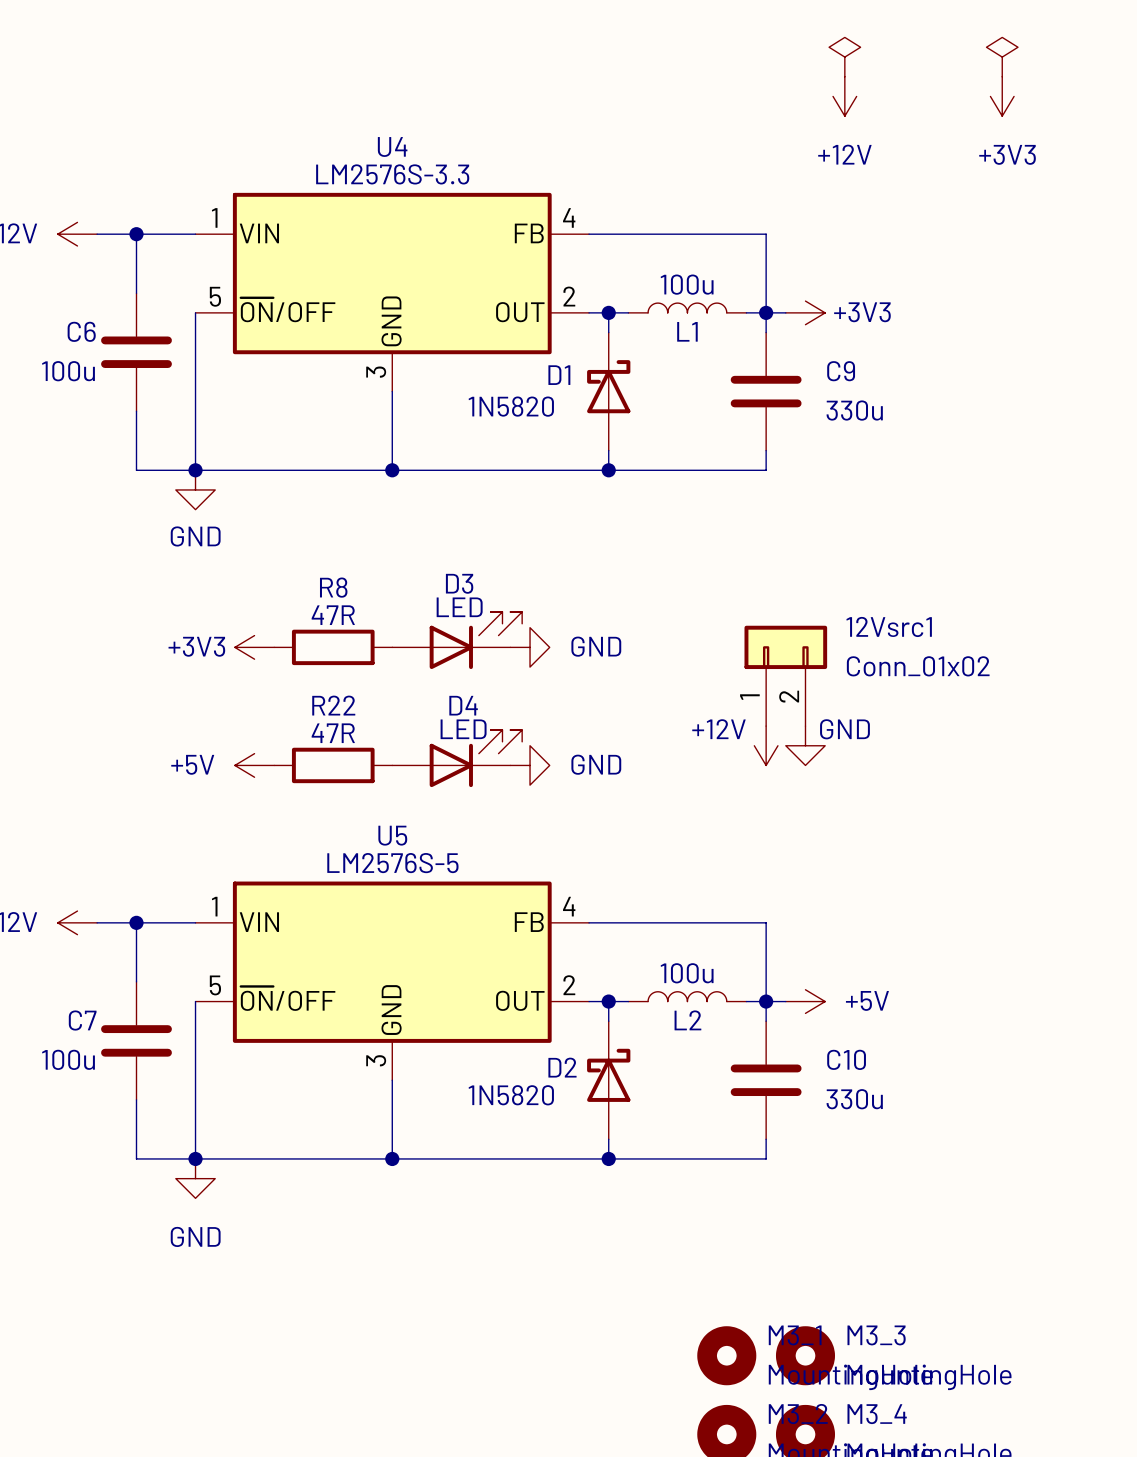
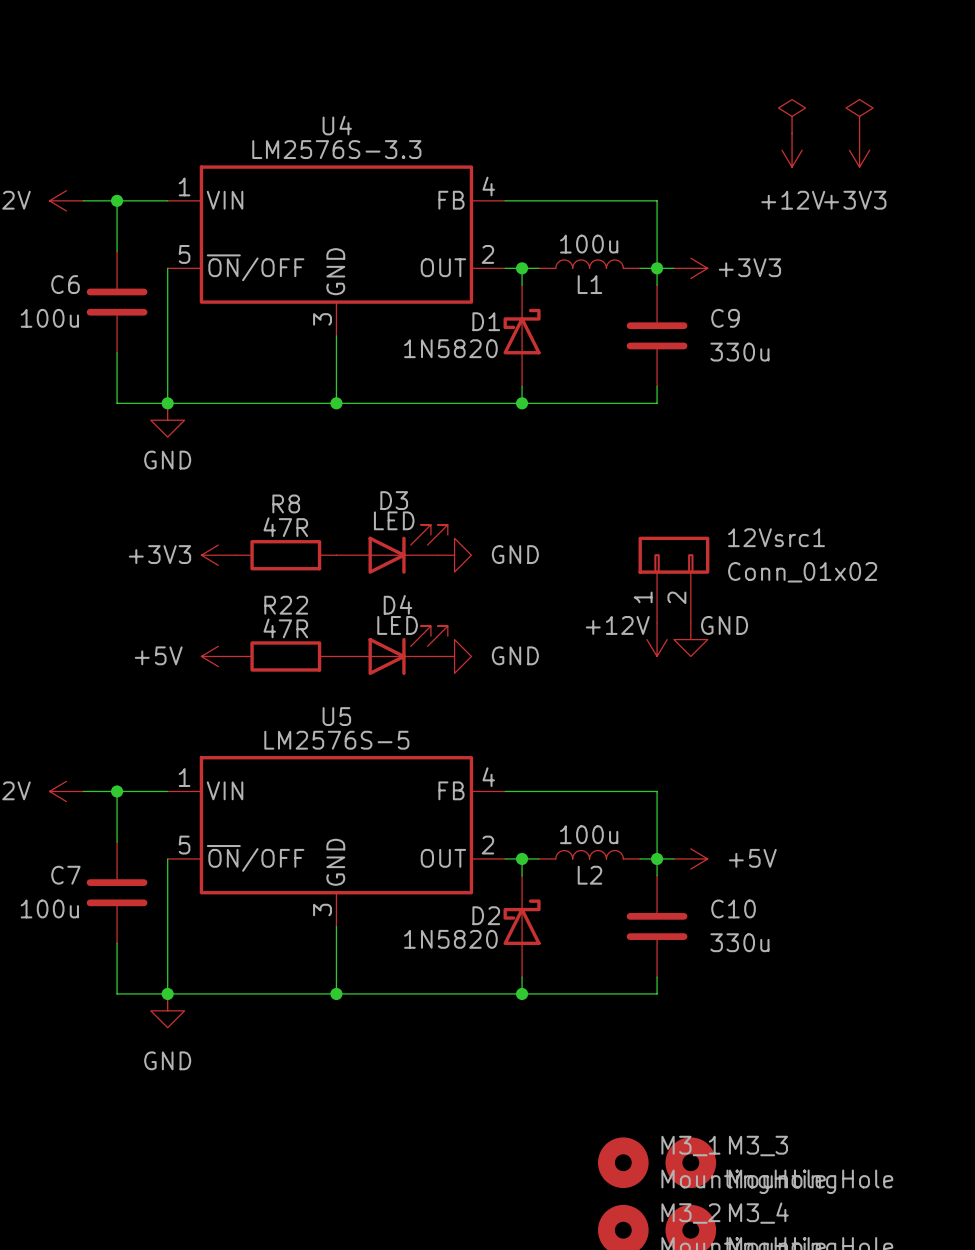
power symbol: (844, 57) -> none
power symbol: (1002, 57) -> none
power symbol position: +12V (844, 96) -> +12V (792, 150)
power symbol position: +3V3 (1002, 96) -> +3V3 (859, 150)
power symbol: none -> (792, 116)
power symbol: none -> (859, 116)

